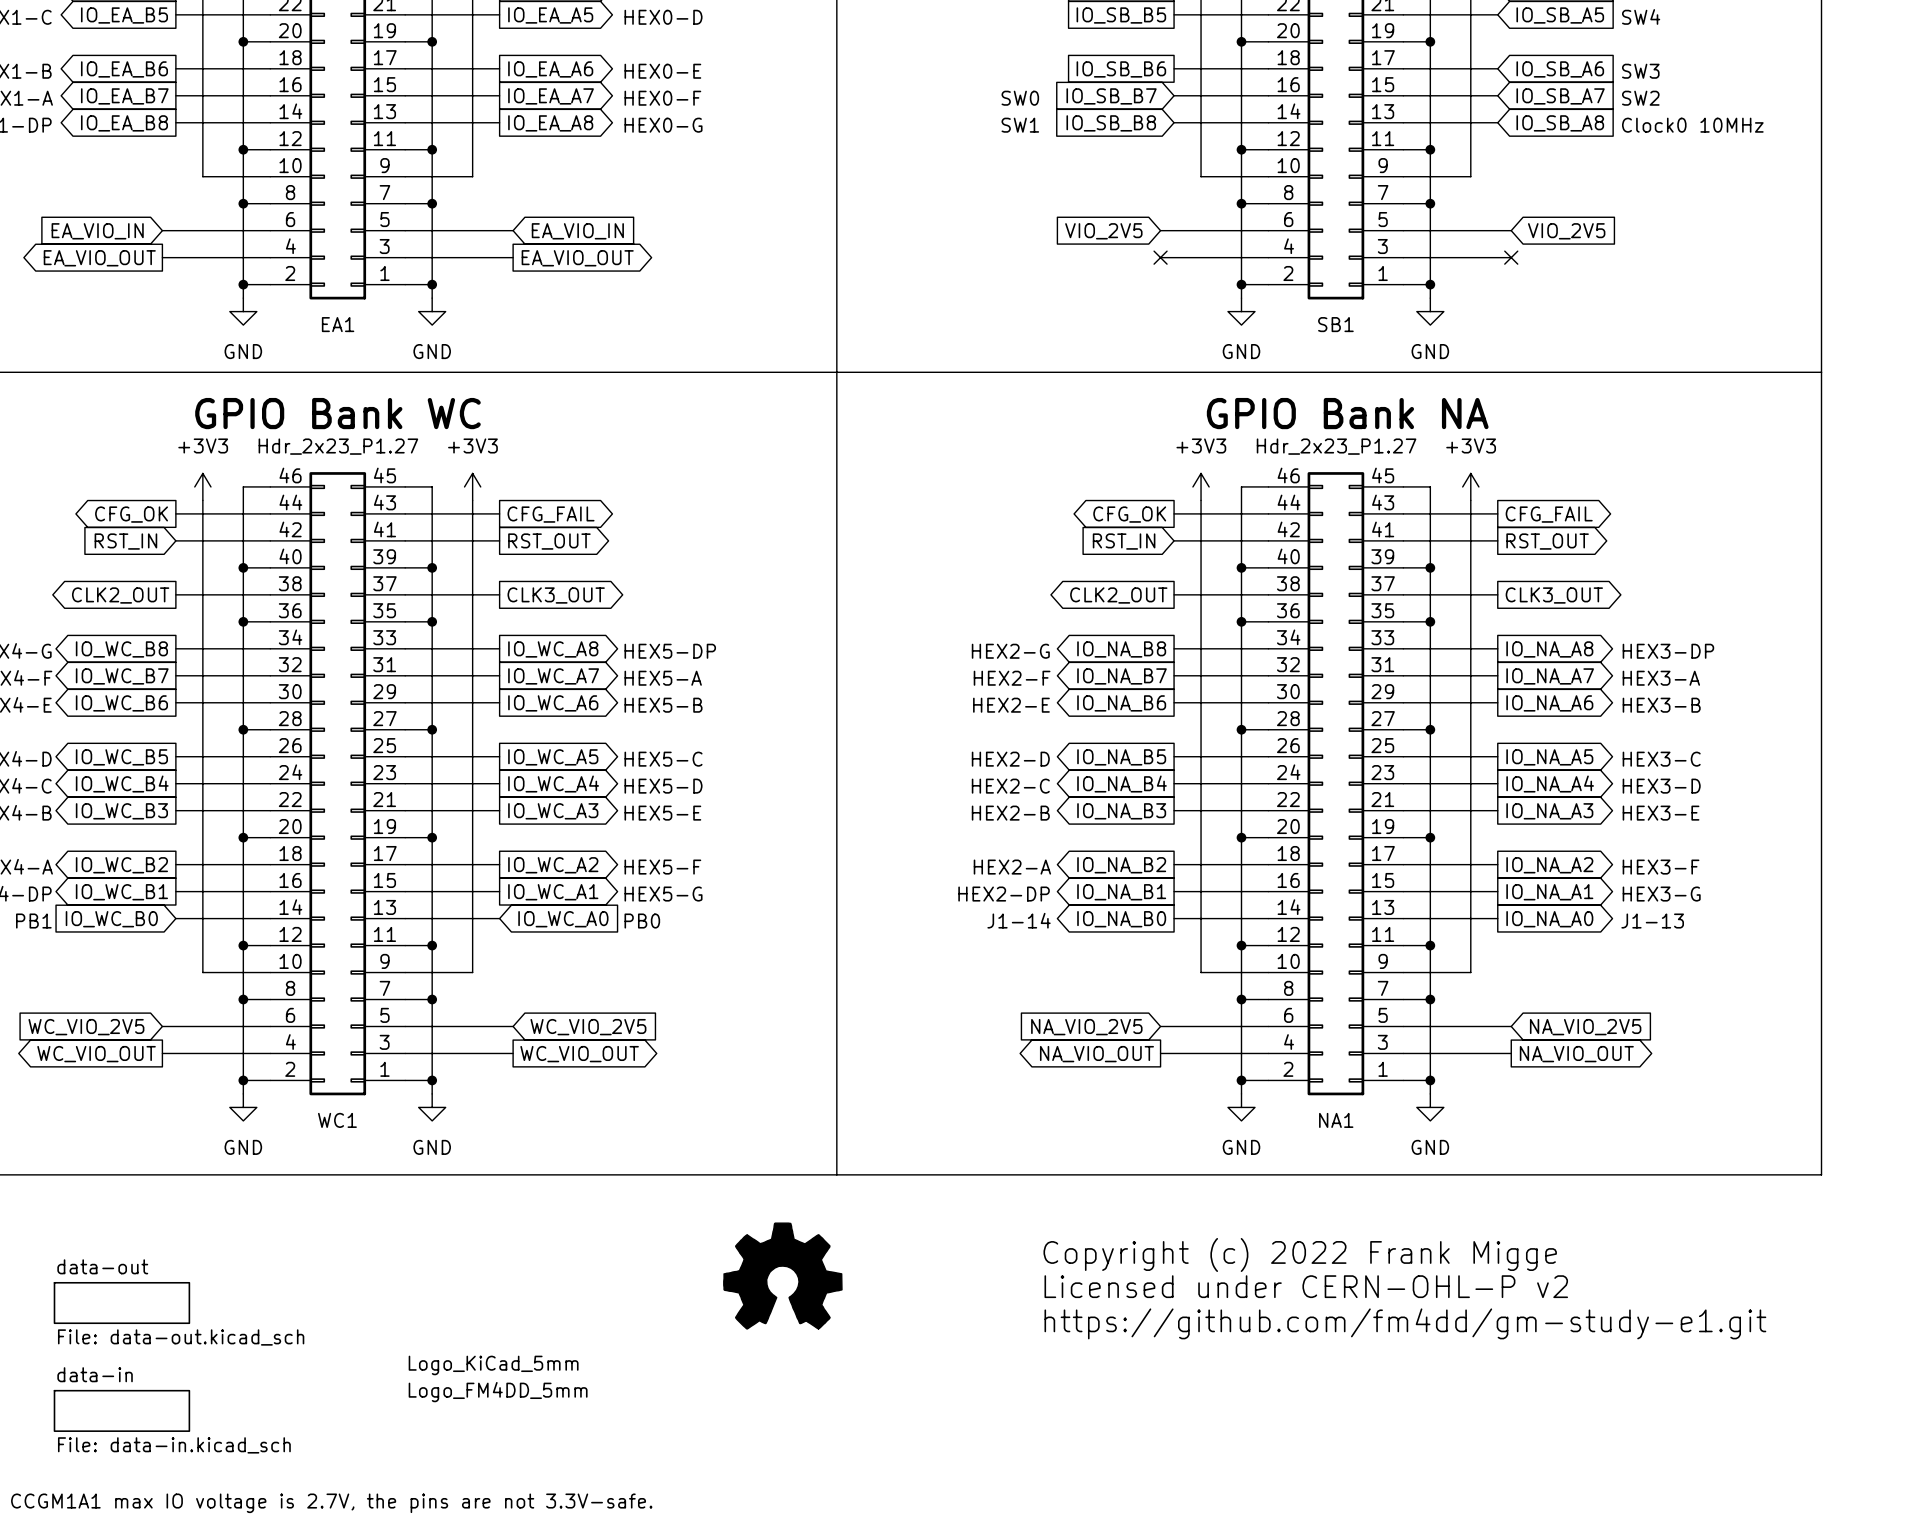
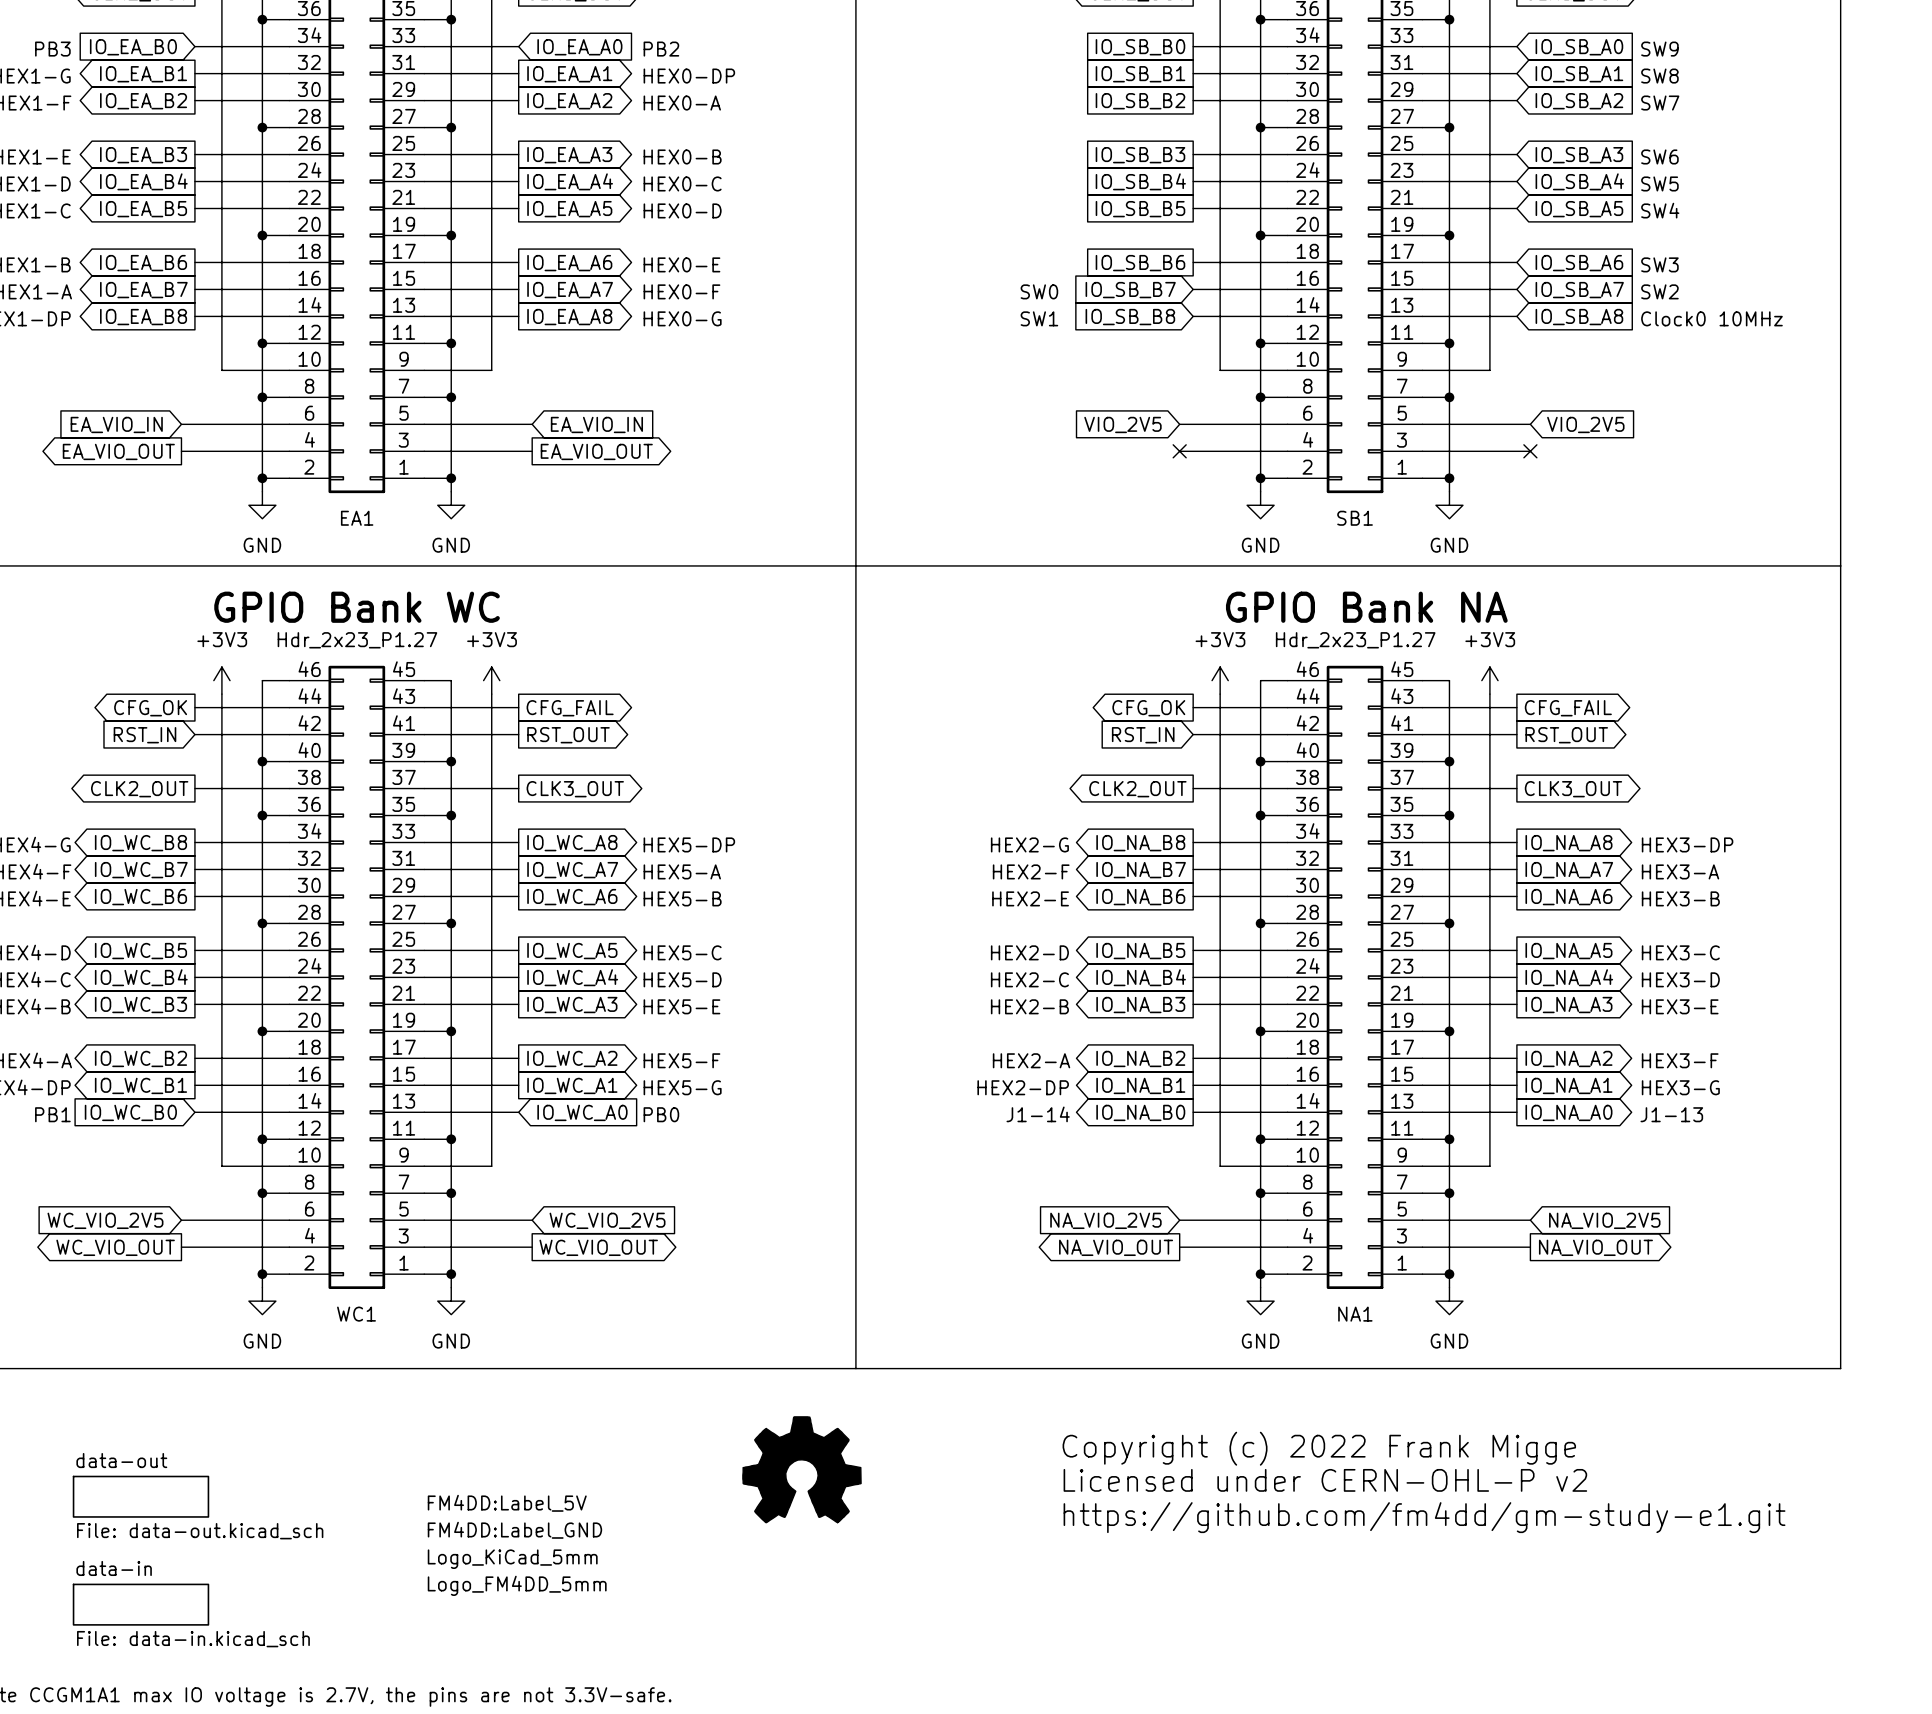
part: none -> (507, 1503)
part: none -> (514, 1530)

